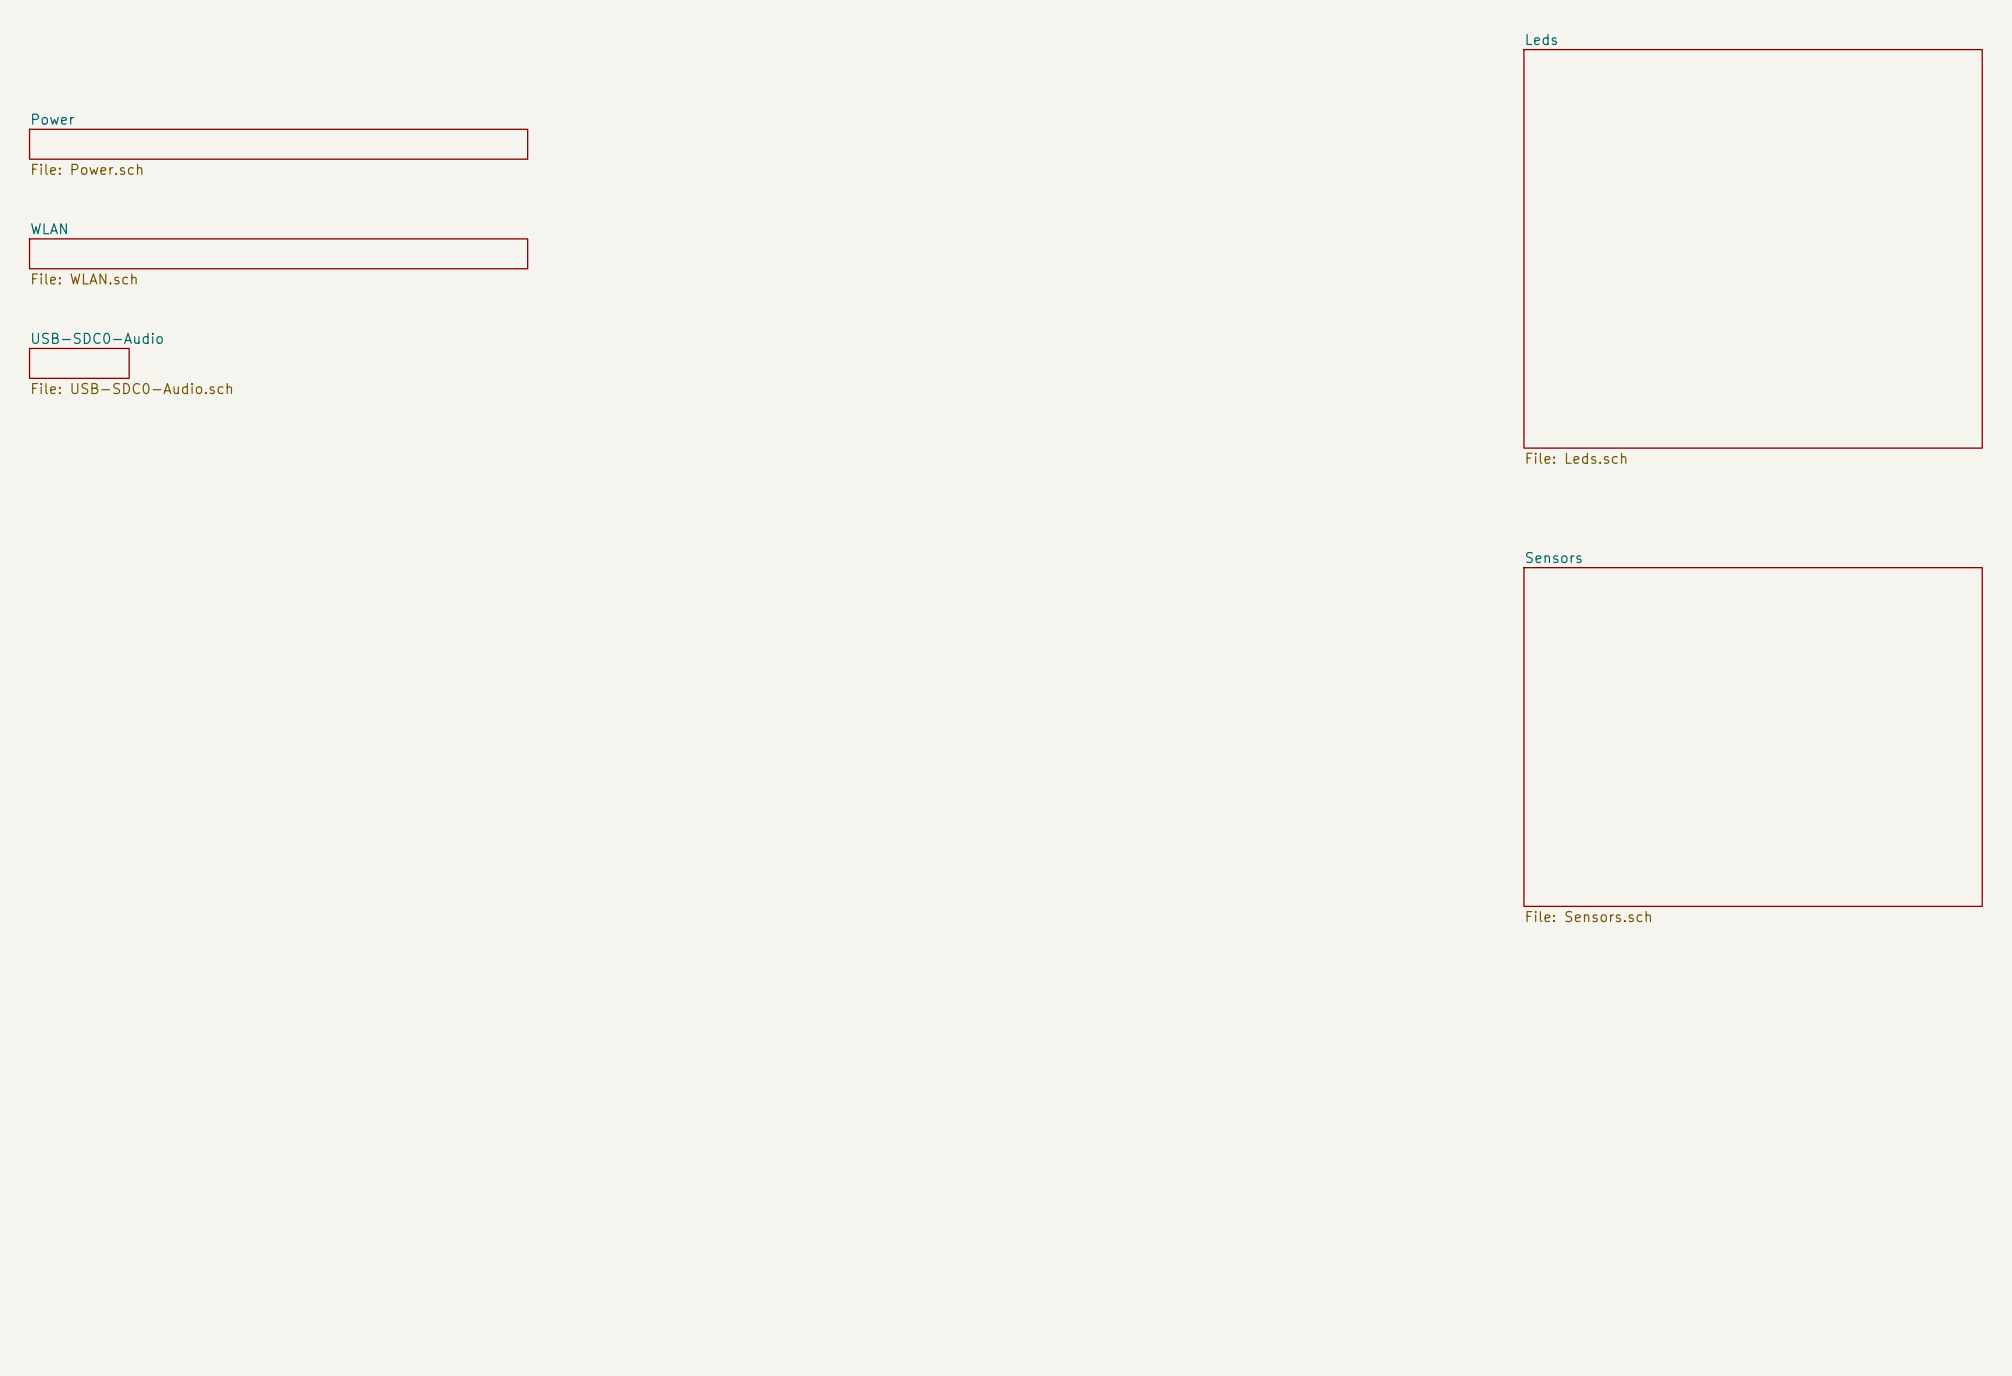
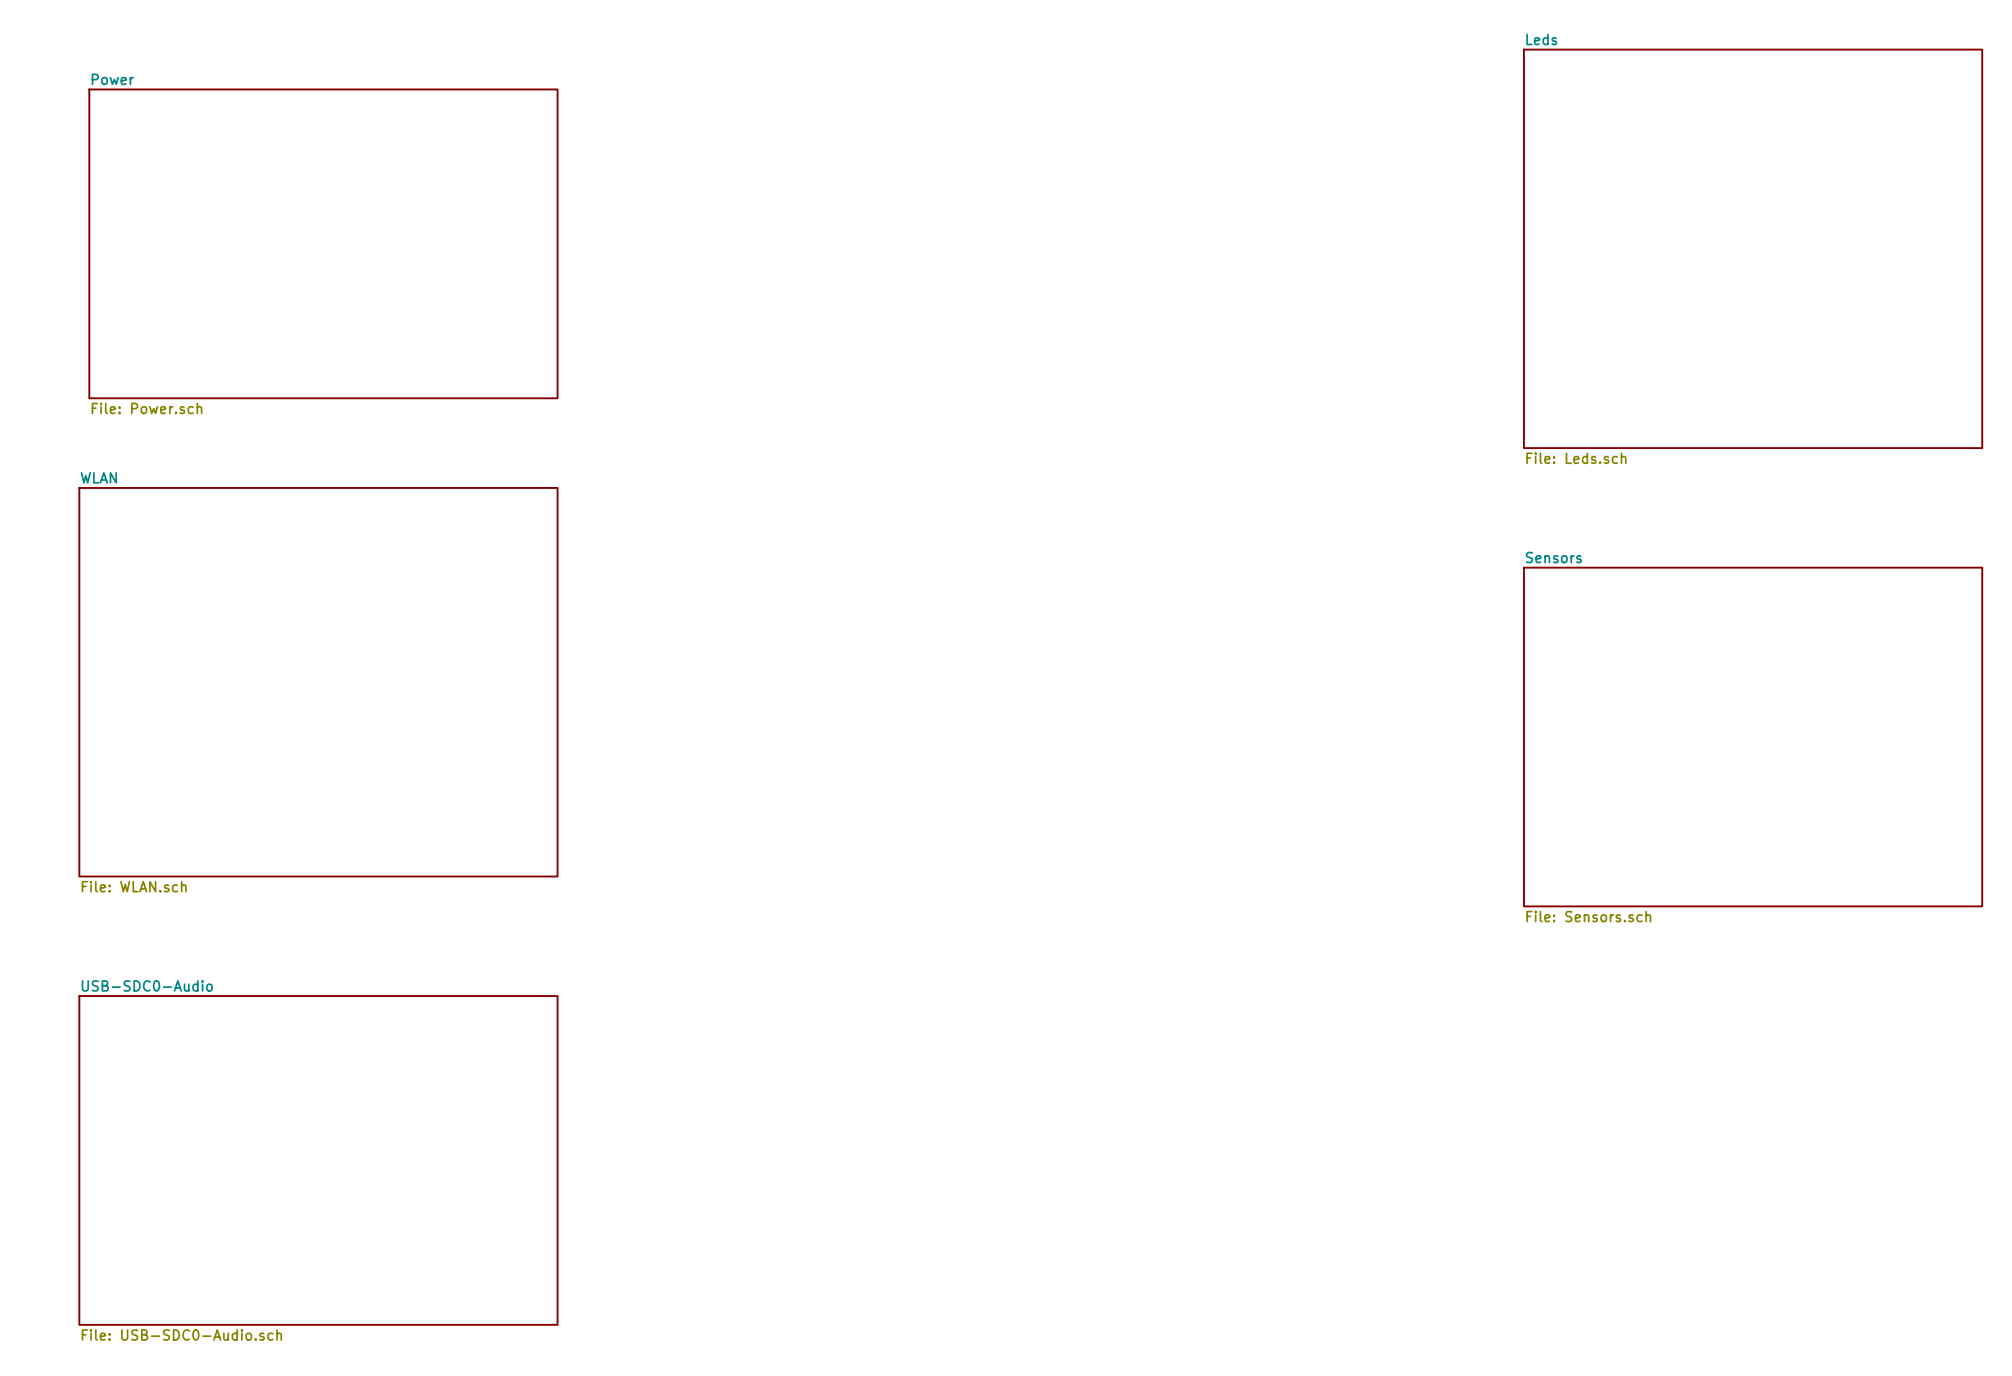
sheet Power: File: Power.sch (278, 144) -> none
sheet Power: none -> File: Power.sch (323, 243)
sheet WLAN: File: WLAN.sch (278, 253) -> none
sheet USB-SDC0-Audio name position: USB-SDC0-Audio (97, 338) -> USB-SDC0-Audio (147, 985)
sheet USB-SDC0-Audio shape: [29, 348, 130, 379] -> [79, 996, 558, 1325]
sheet USB-SDC0-Audio value position: File: USB-SDC0-Audio.sch (132, 388) -> File: USB-SDC0-Audio.sch (181, 1334)
sheet WLAN: none -> File: WLAN.sch (318, 682)

